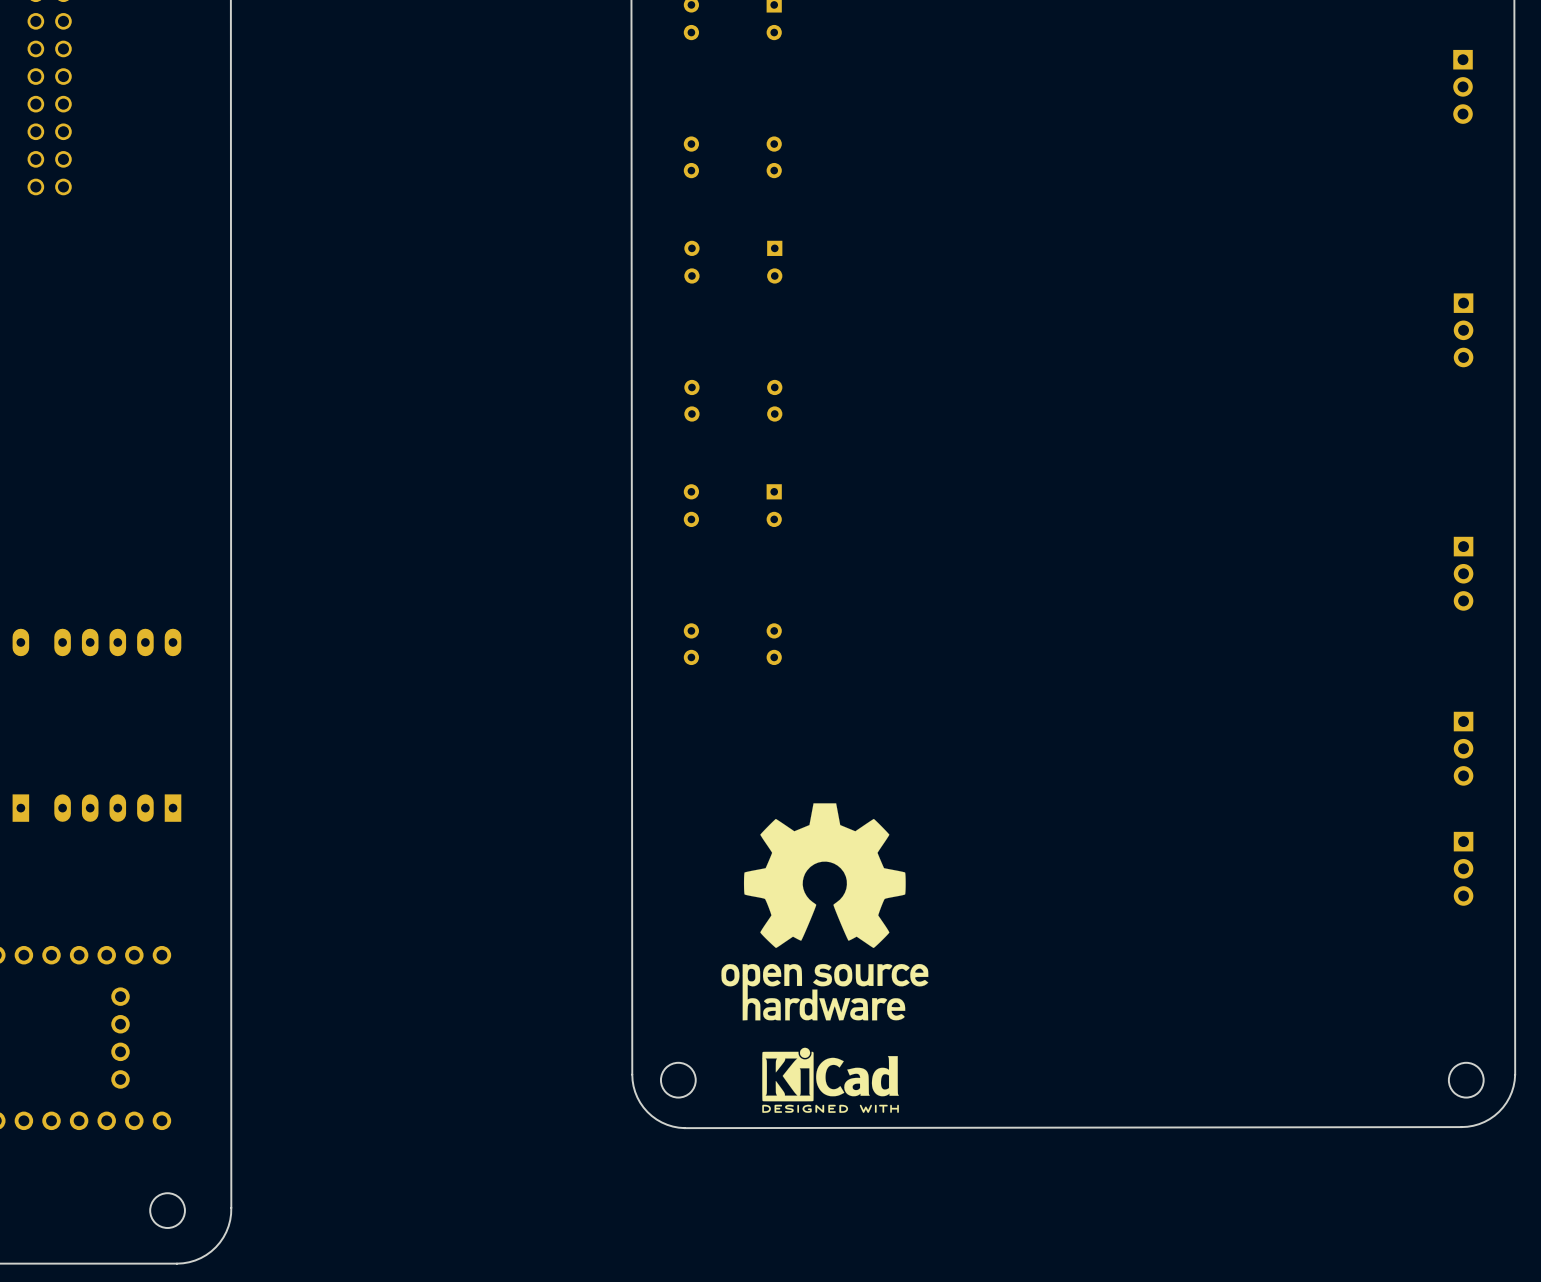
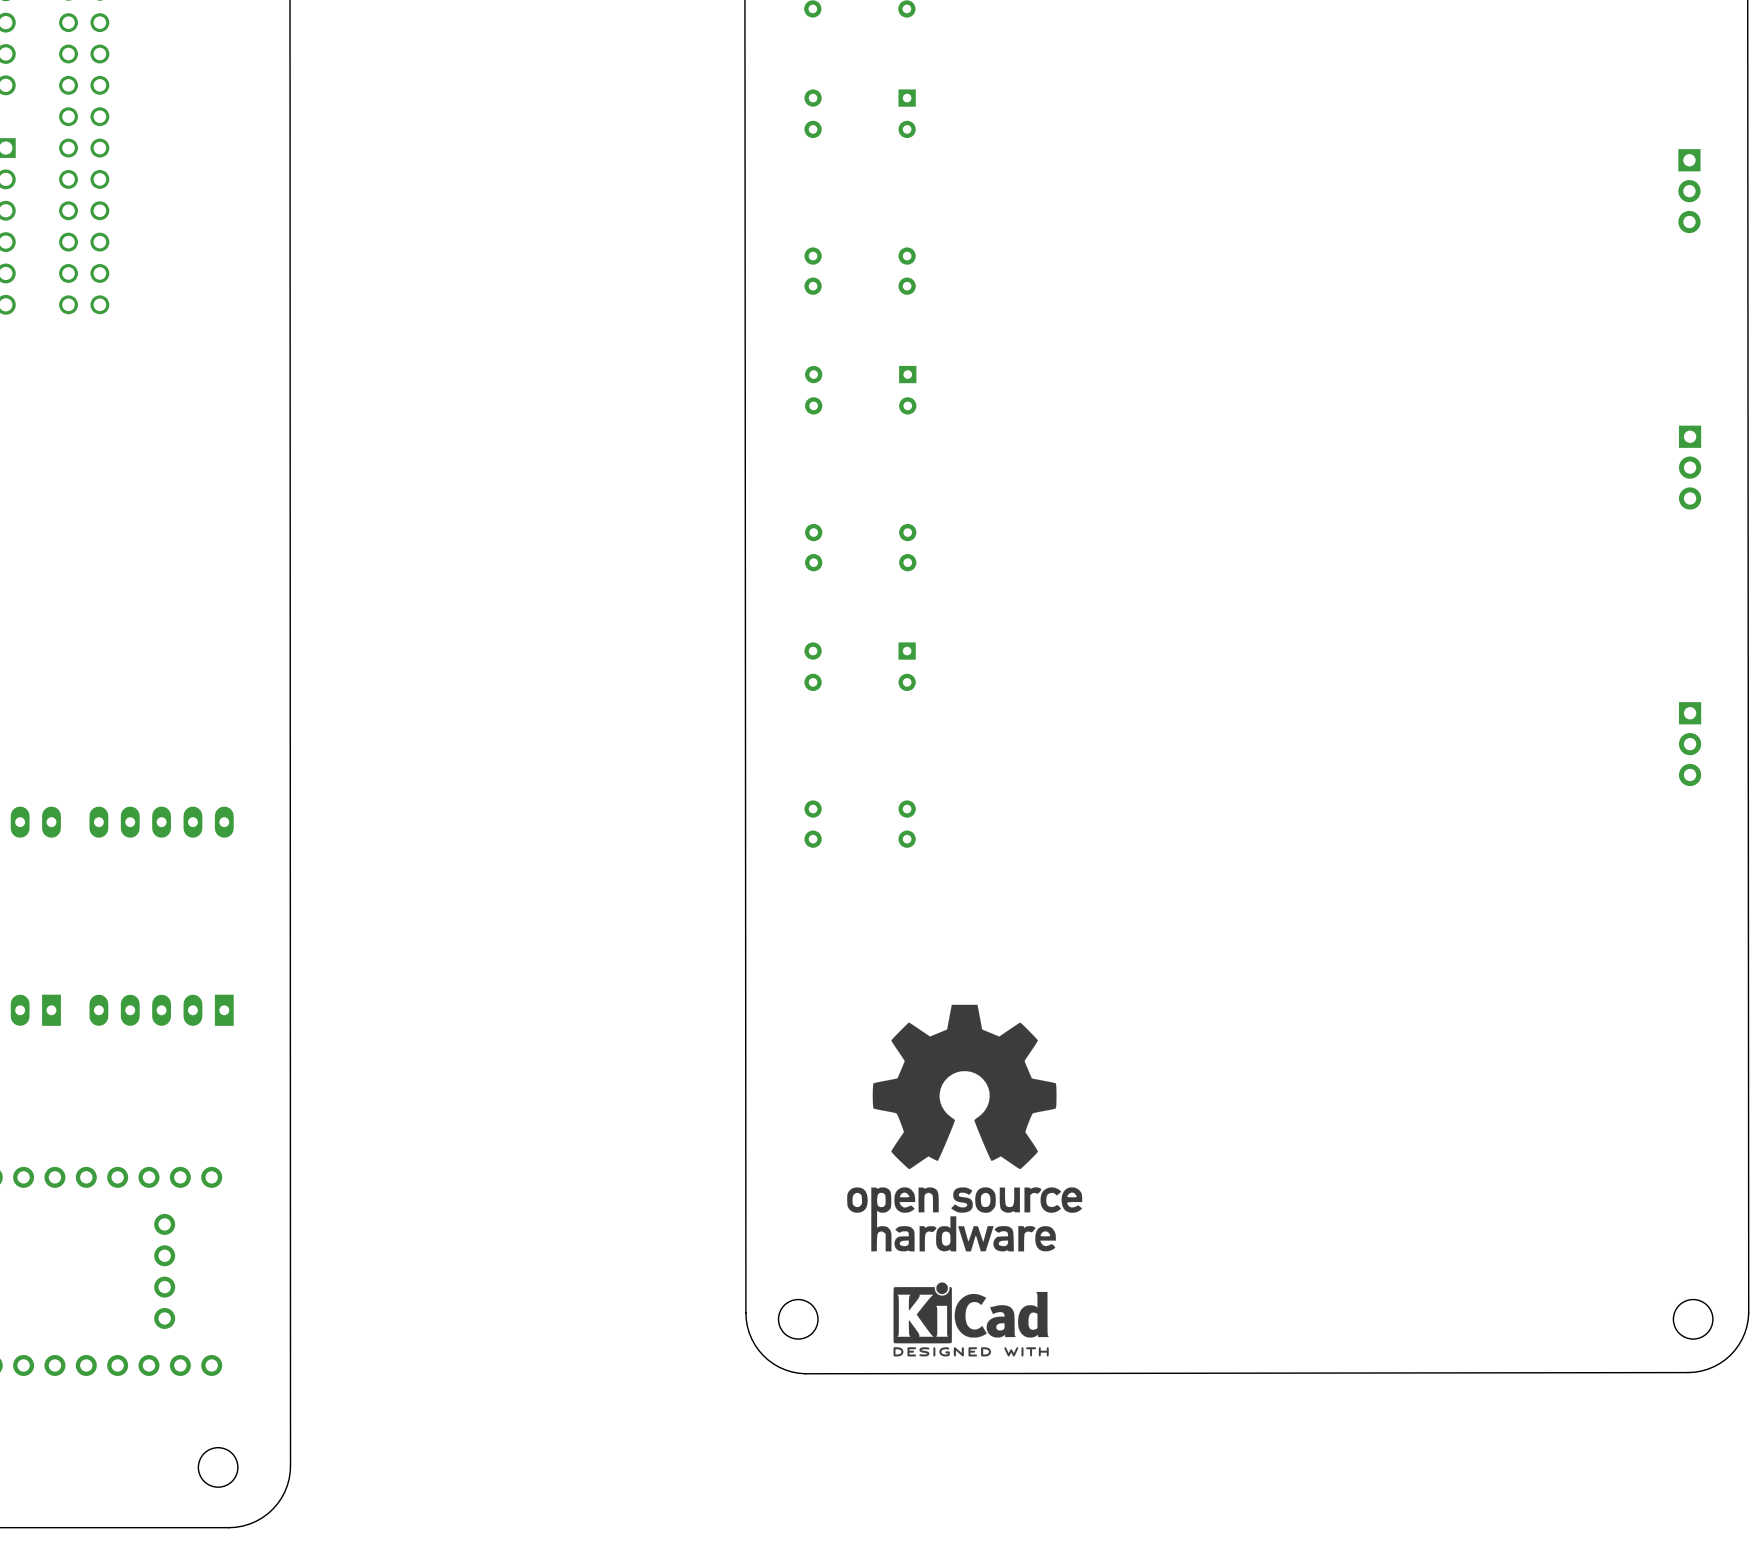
part: (1463, 748) -> none
part: (1463, 868) -> none

